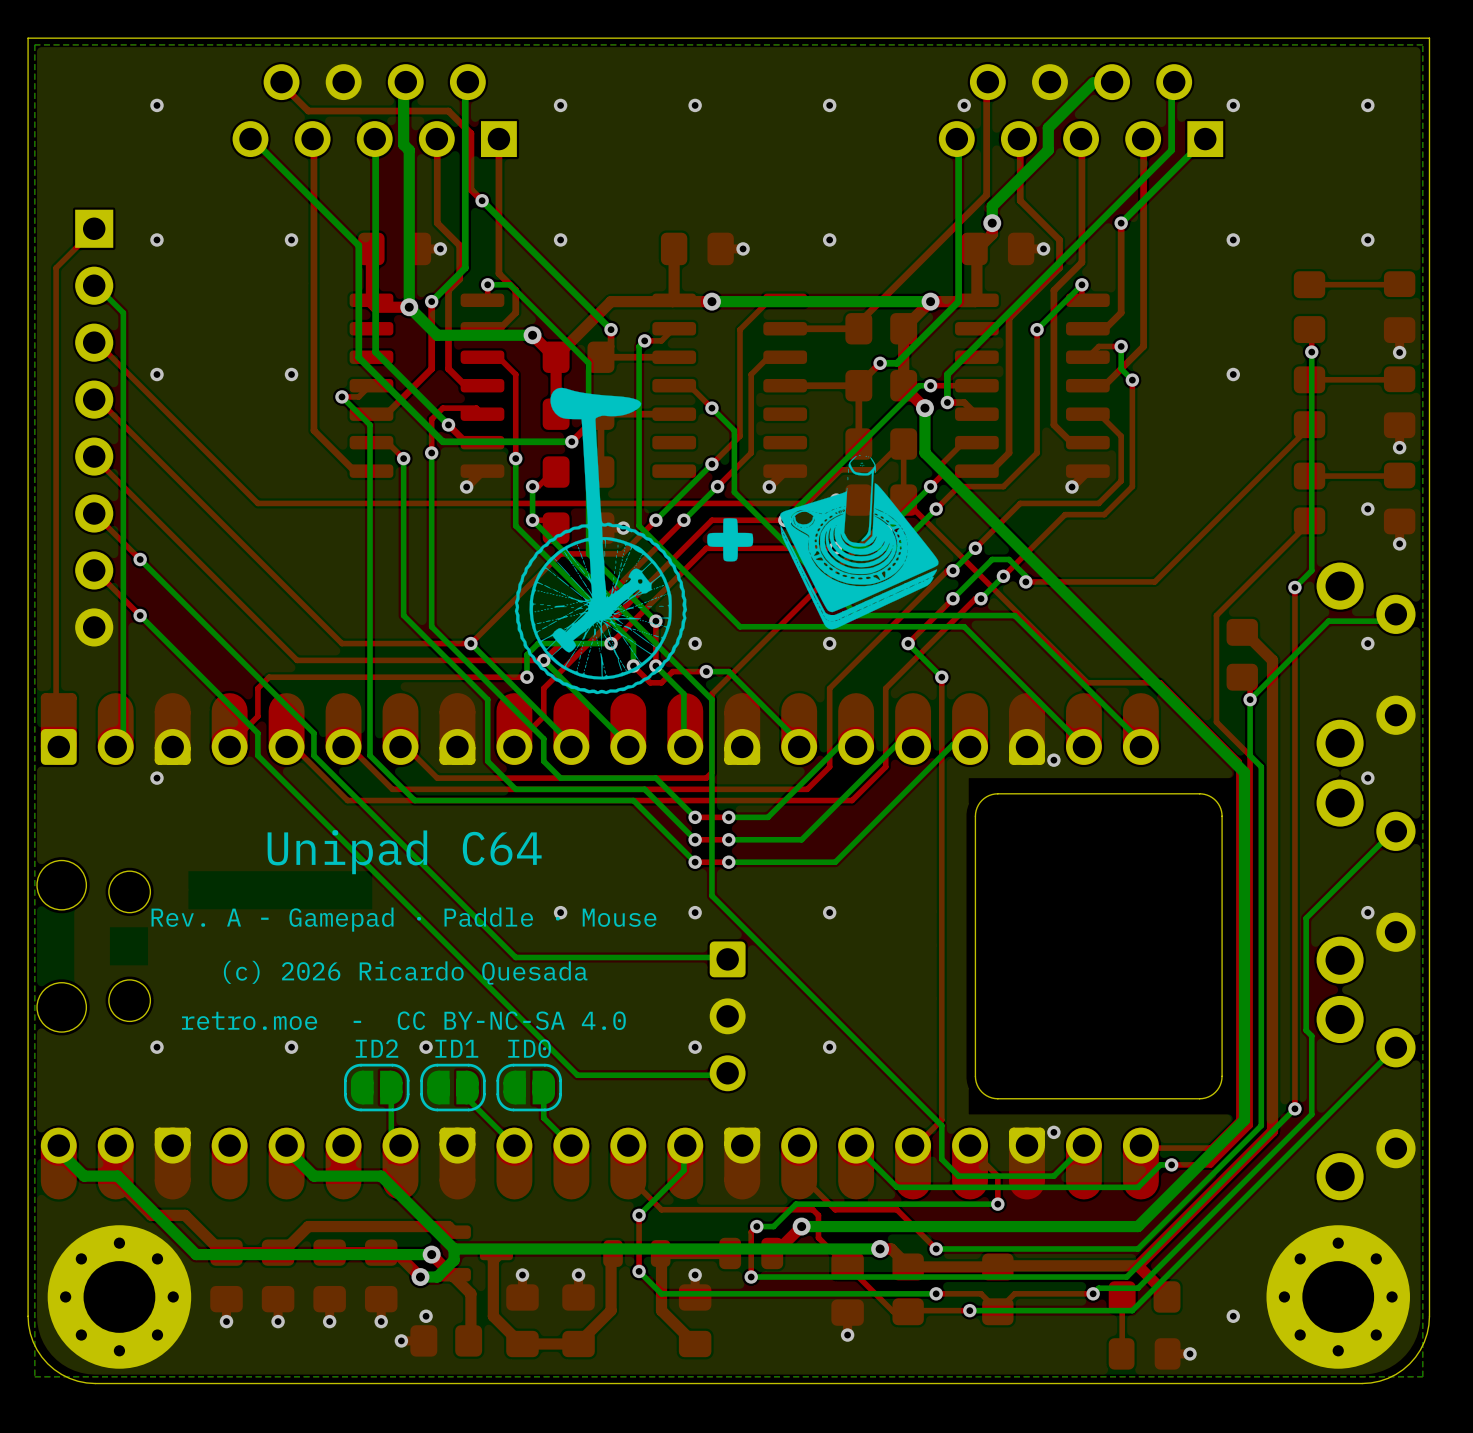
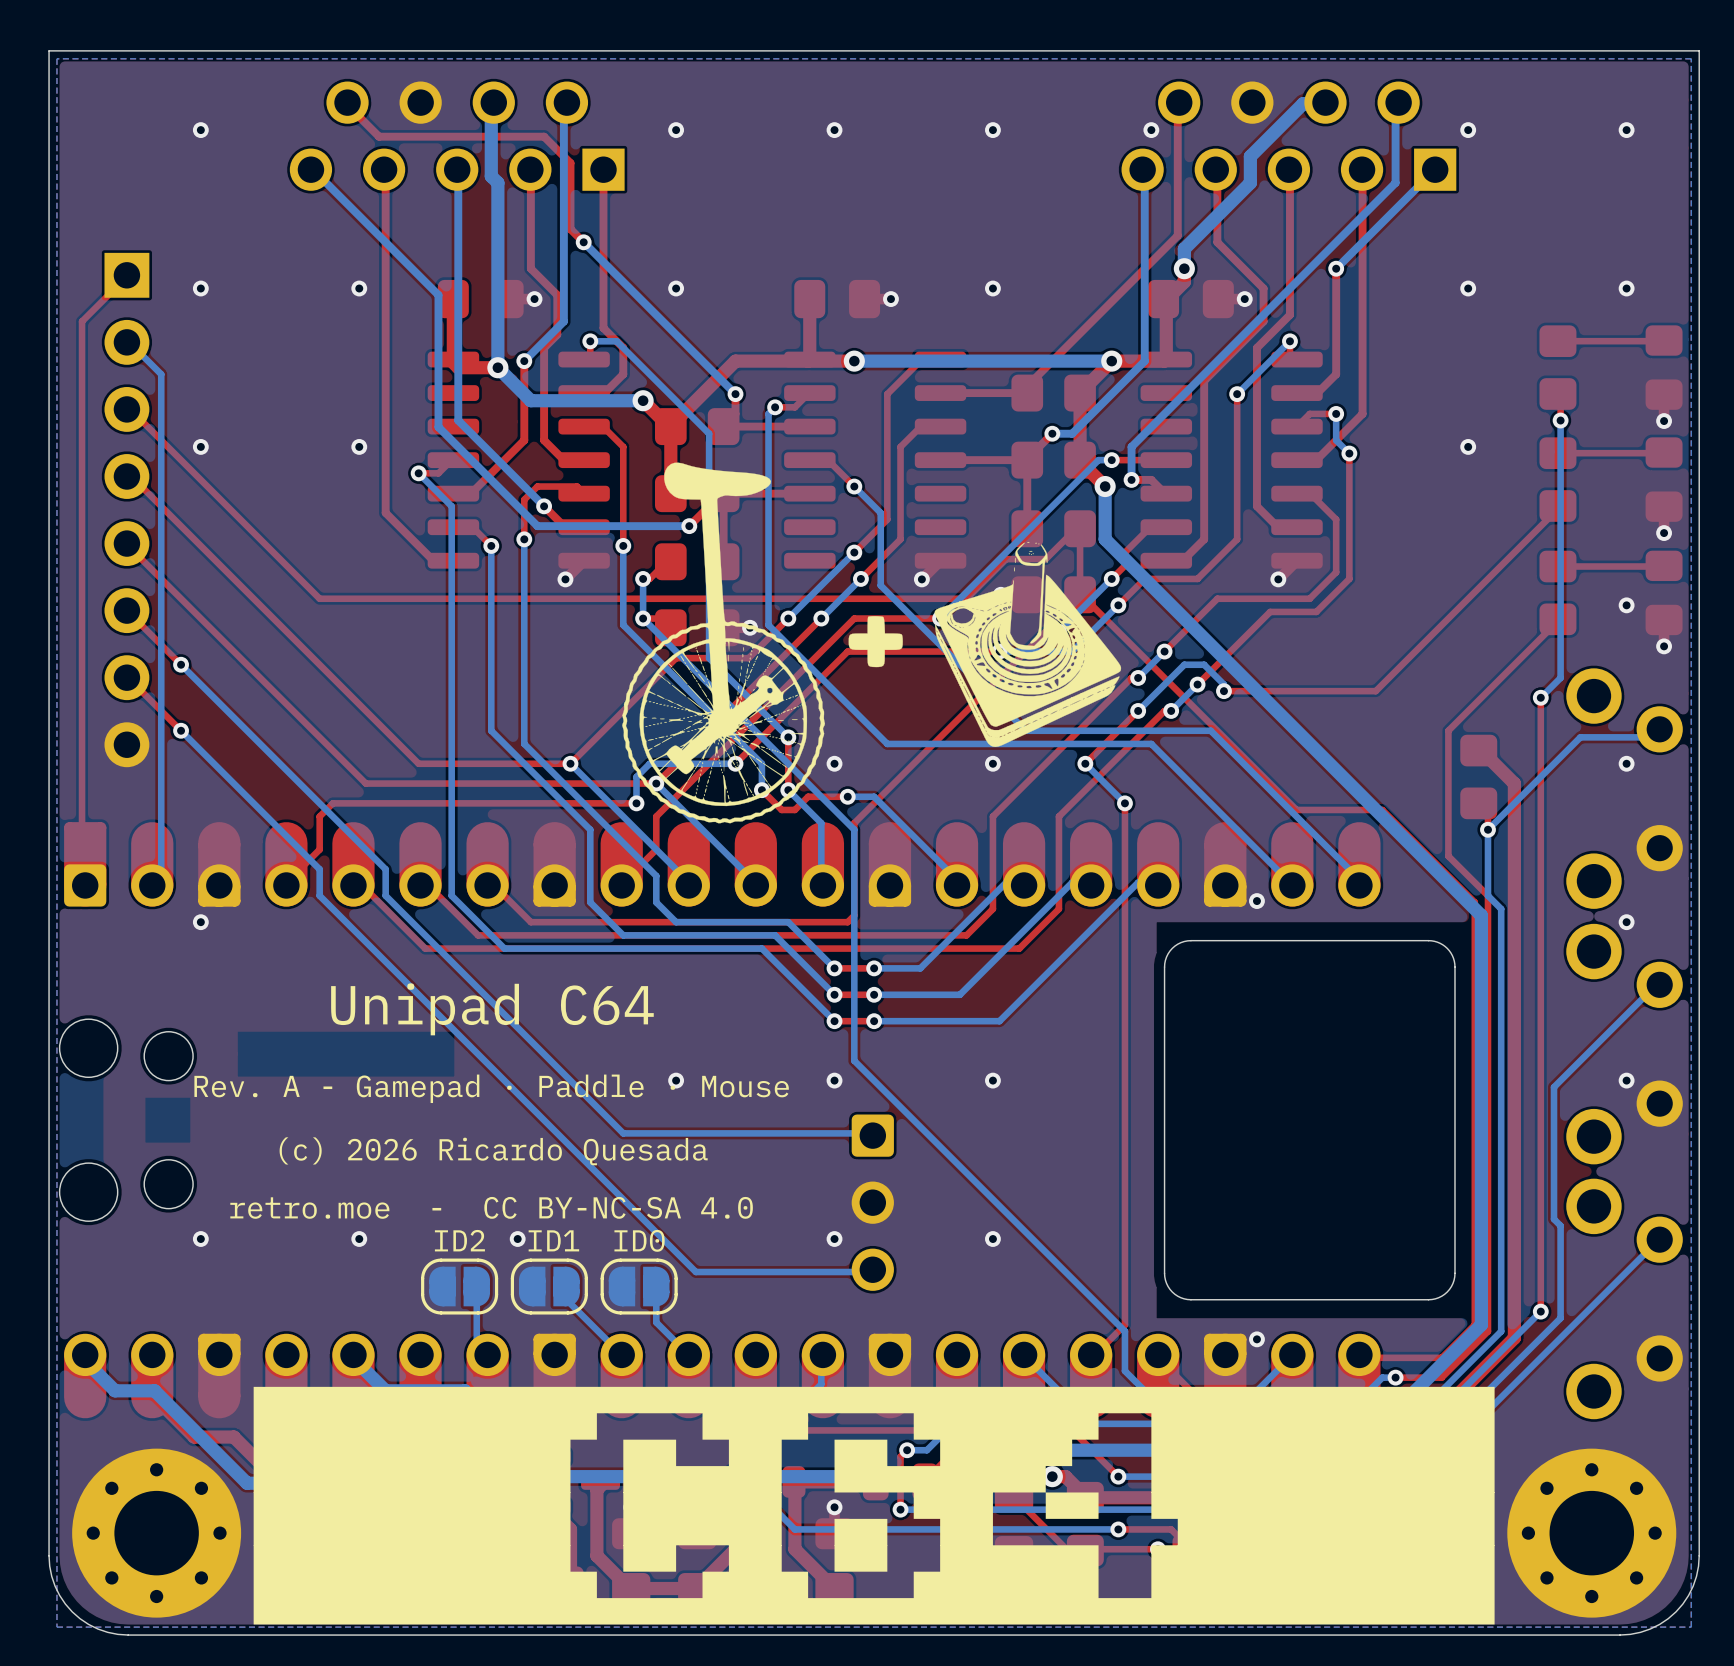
drawing: none -> [253, 1386, 1495, 1625]

